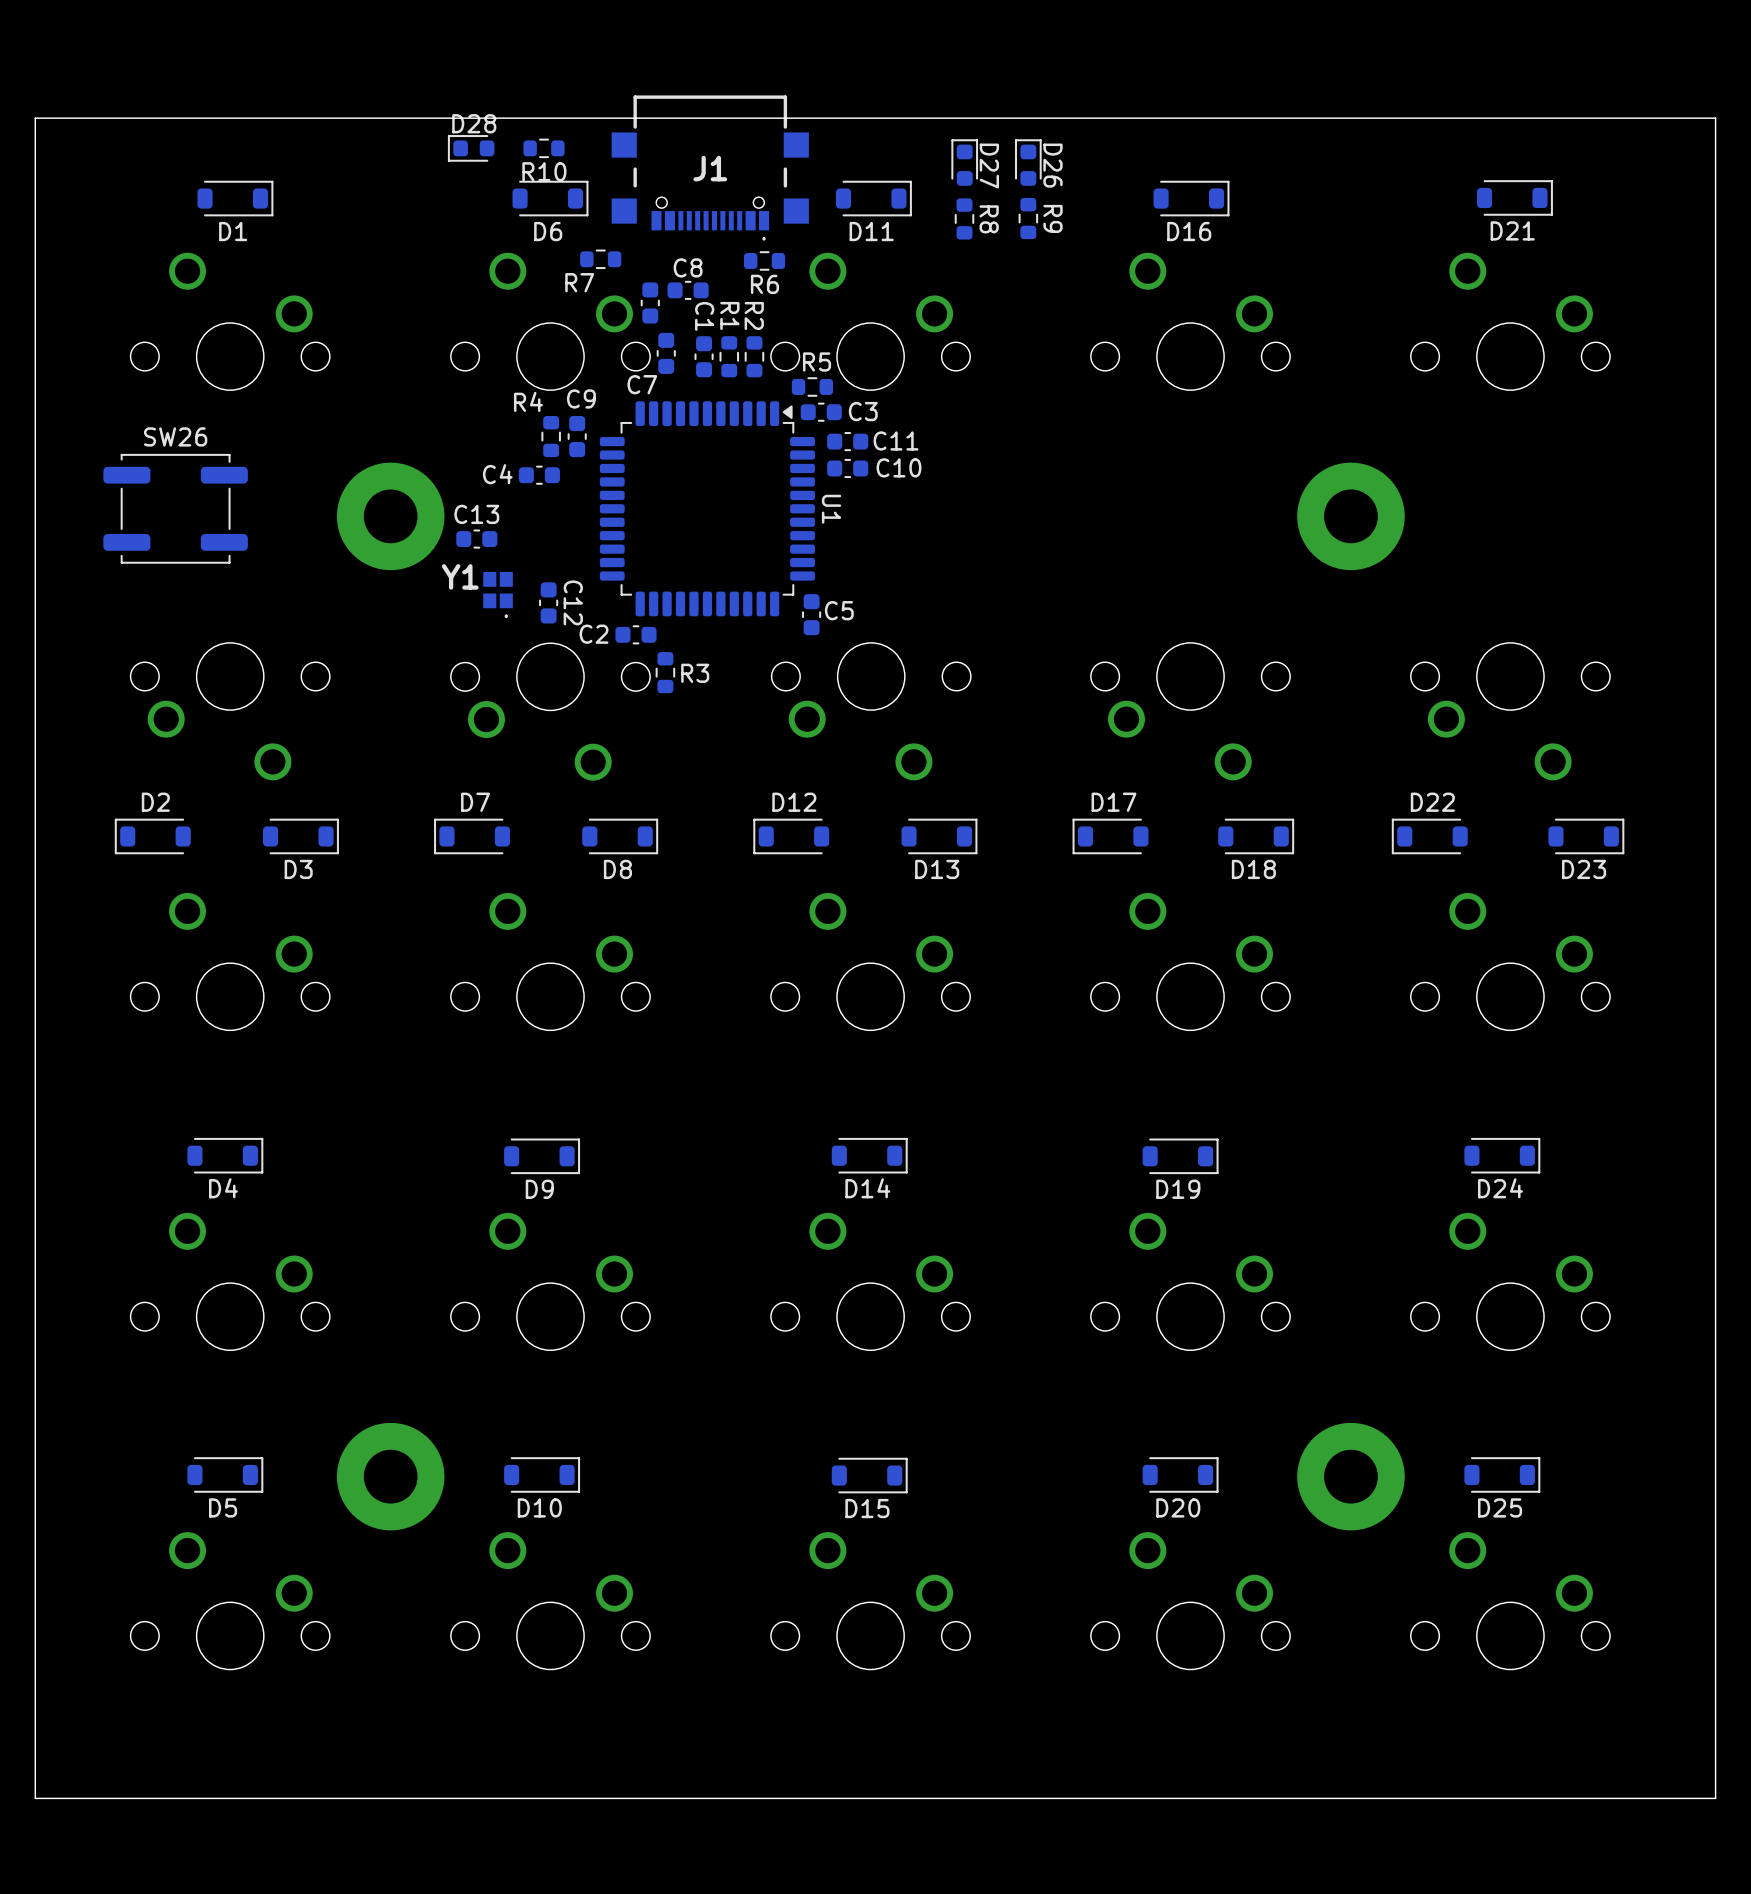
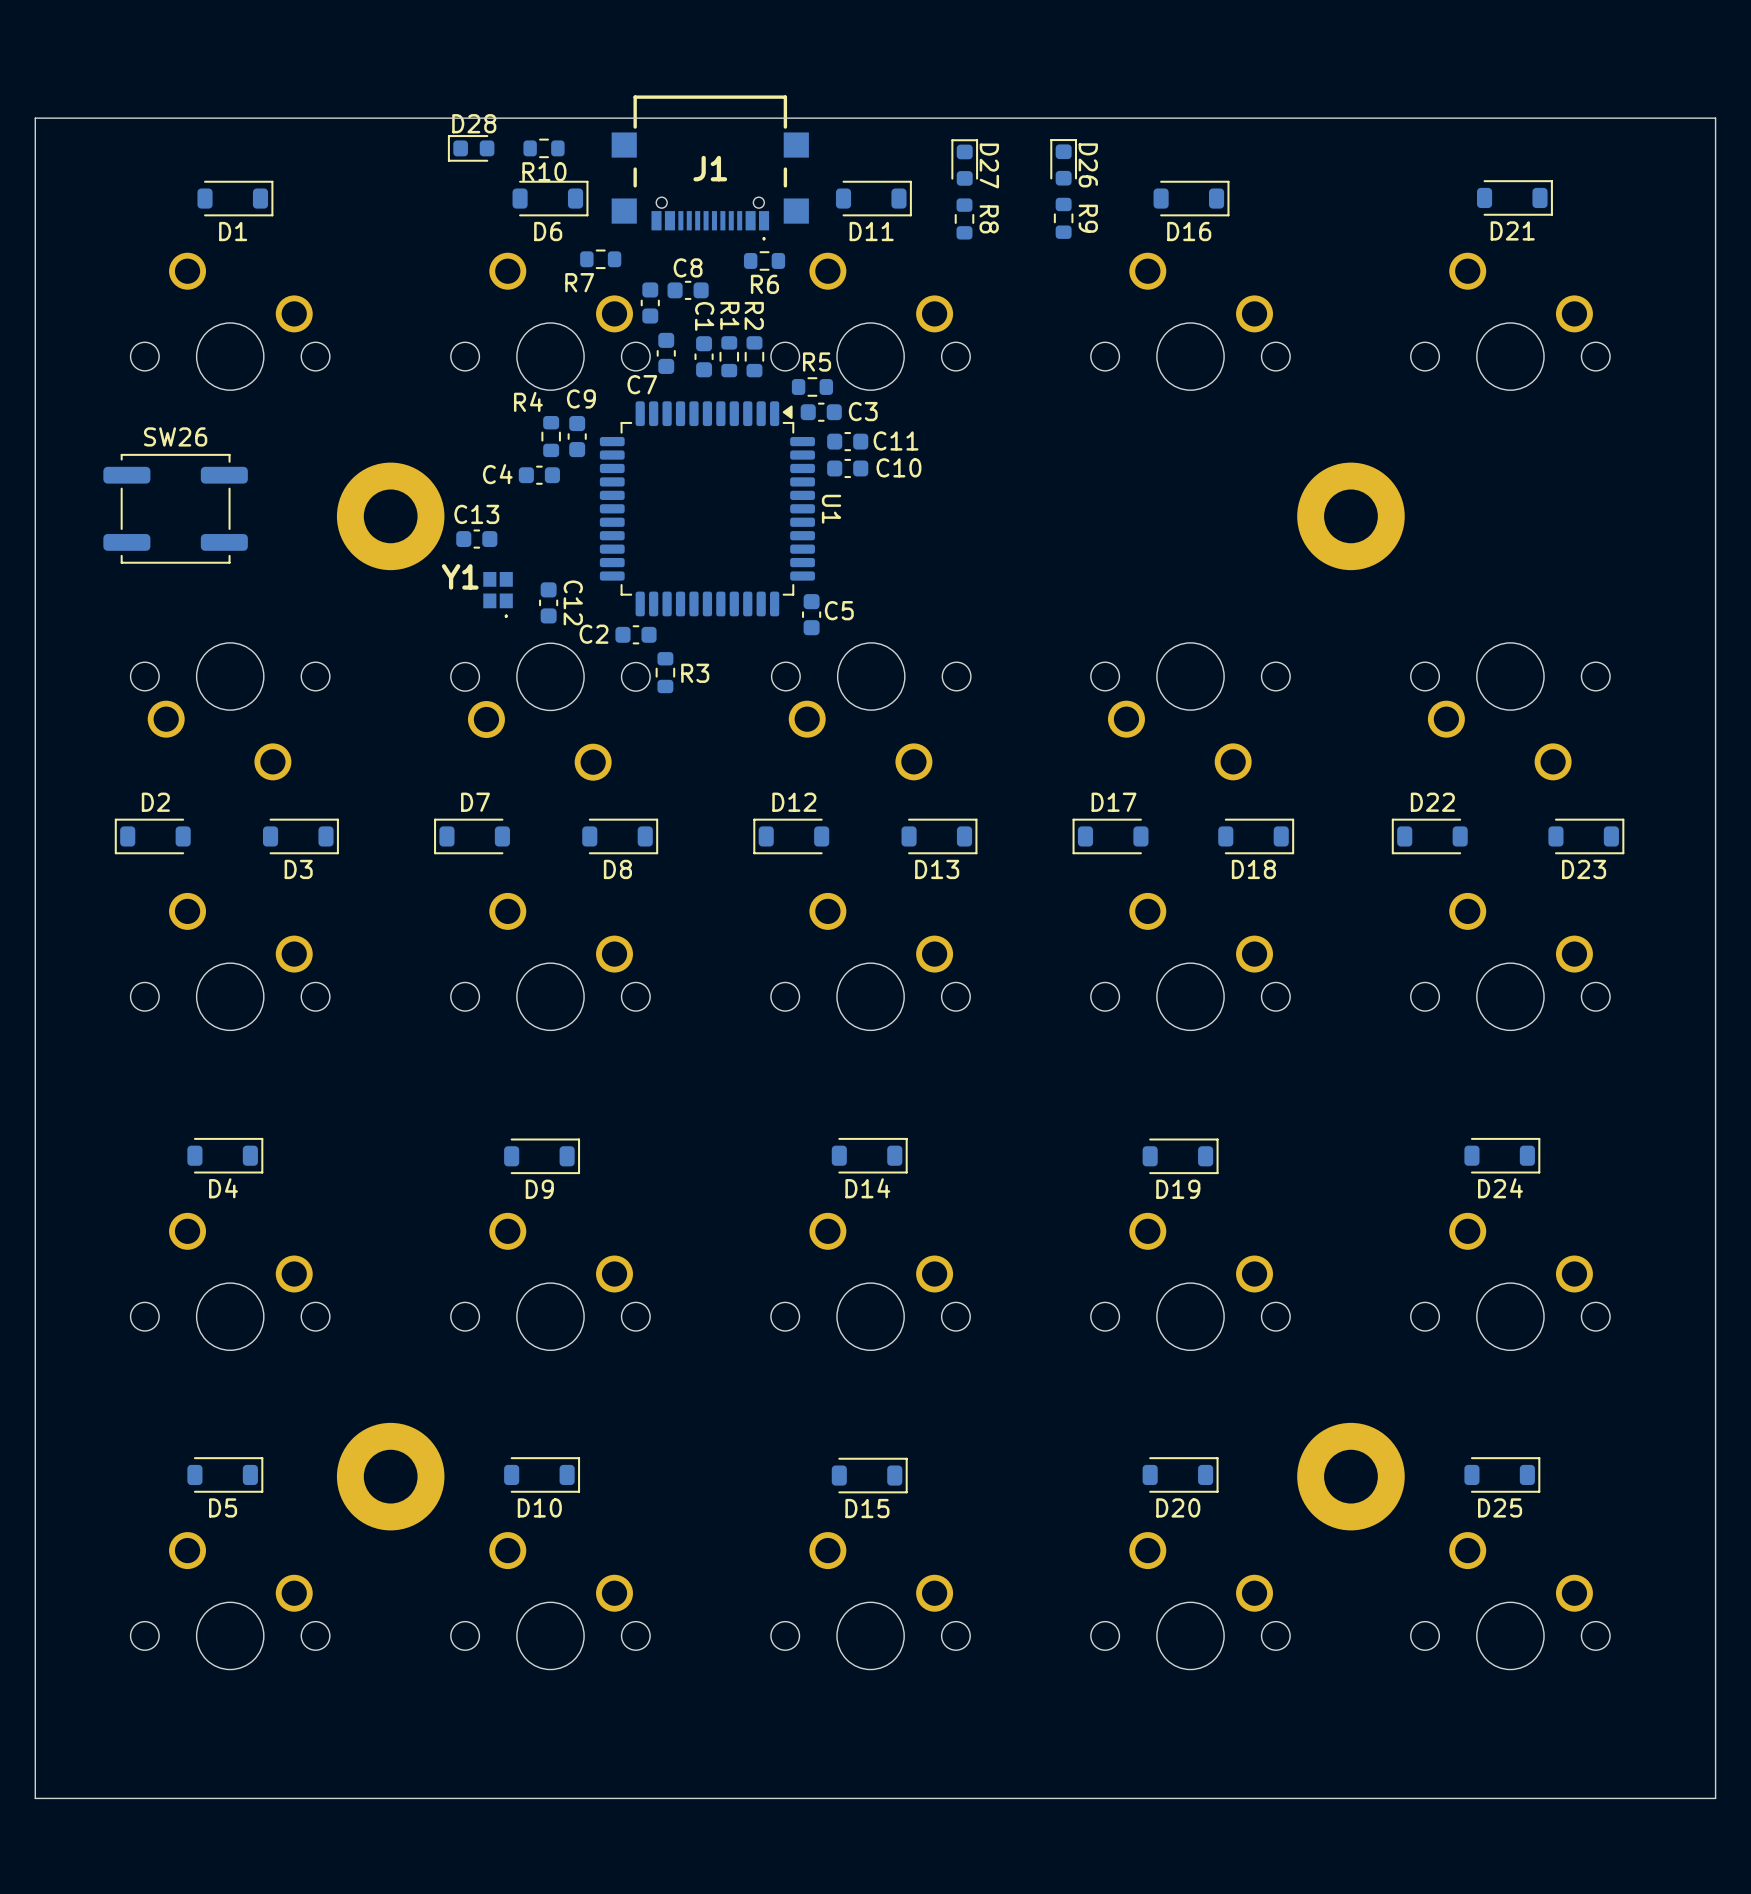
D26 position: (1028, 162) -> (1063, 162)
R9 position: (1028, 218) -> (1063, 218)

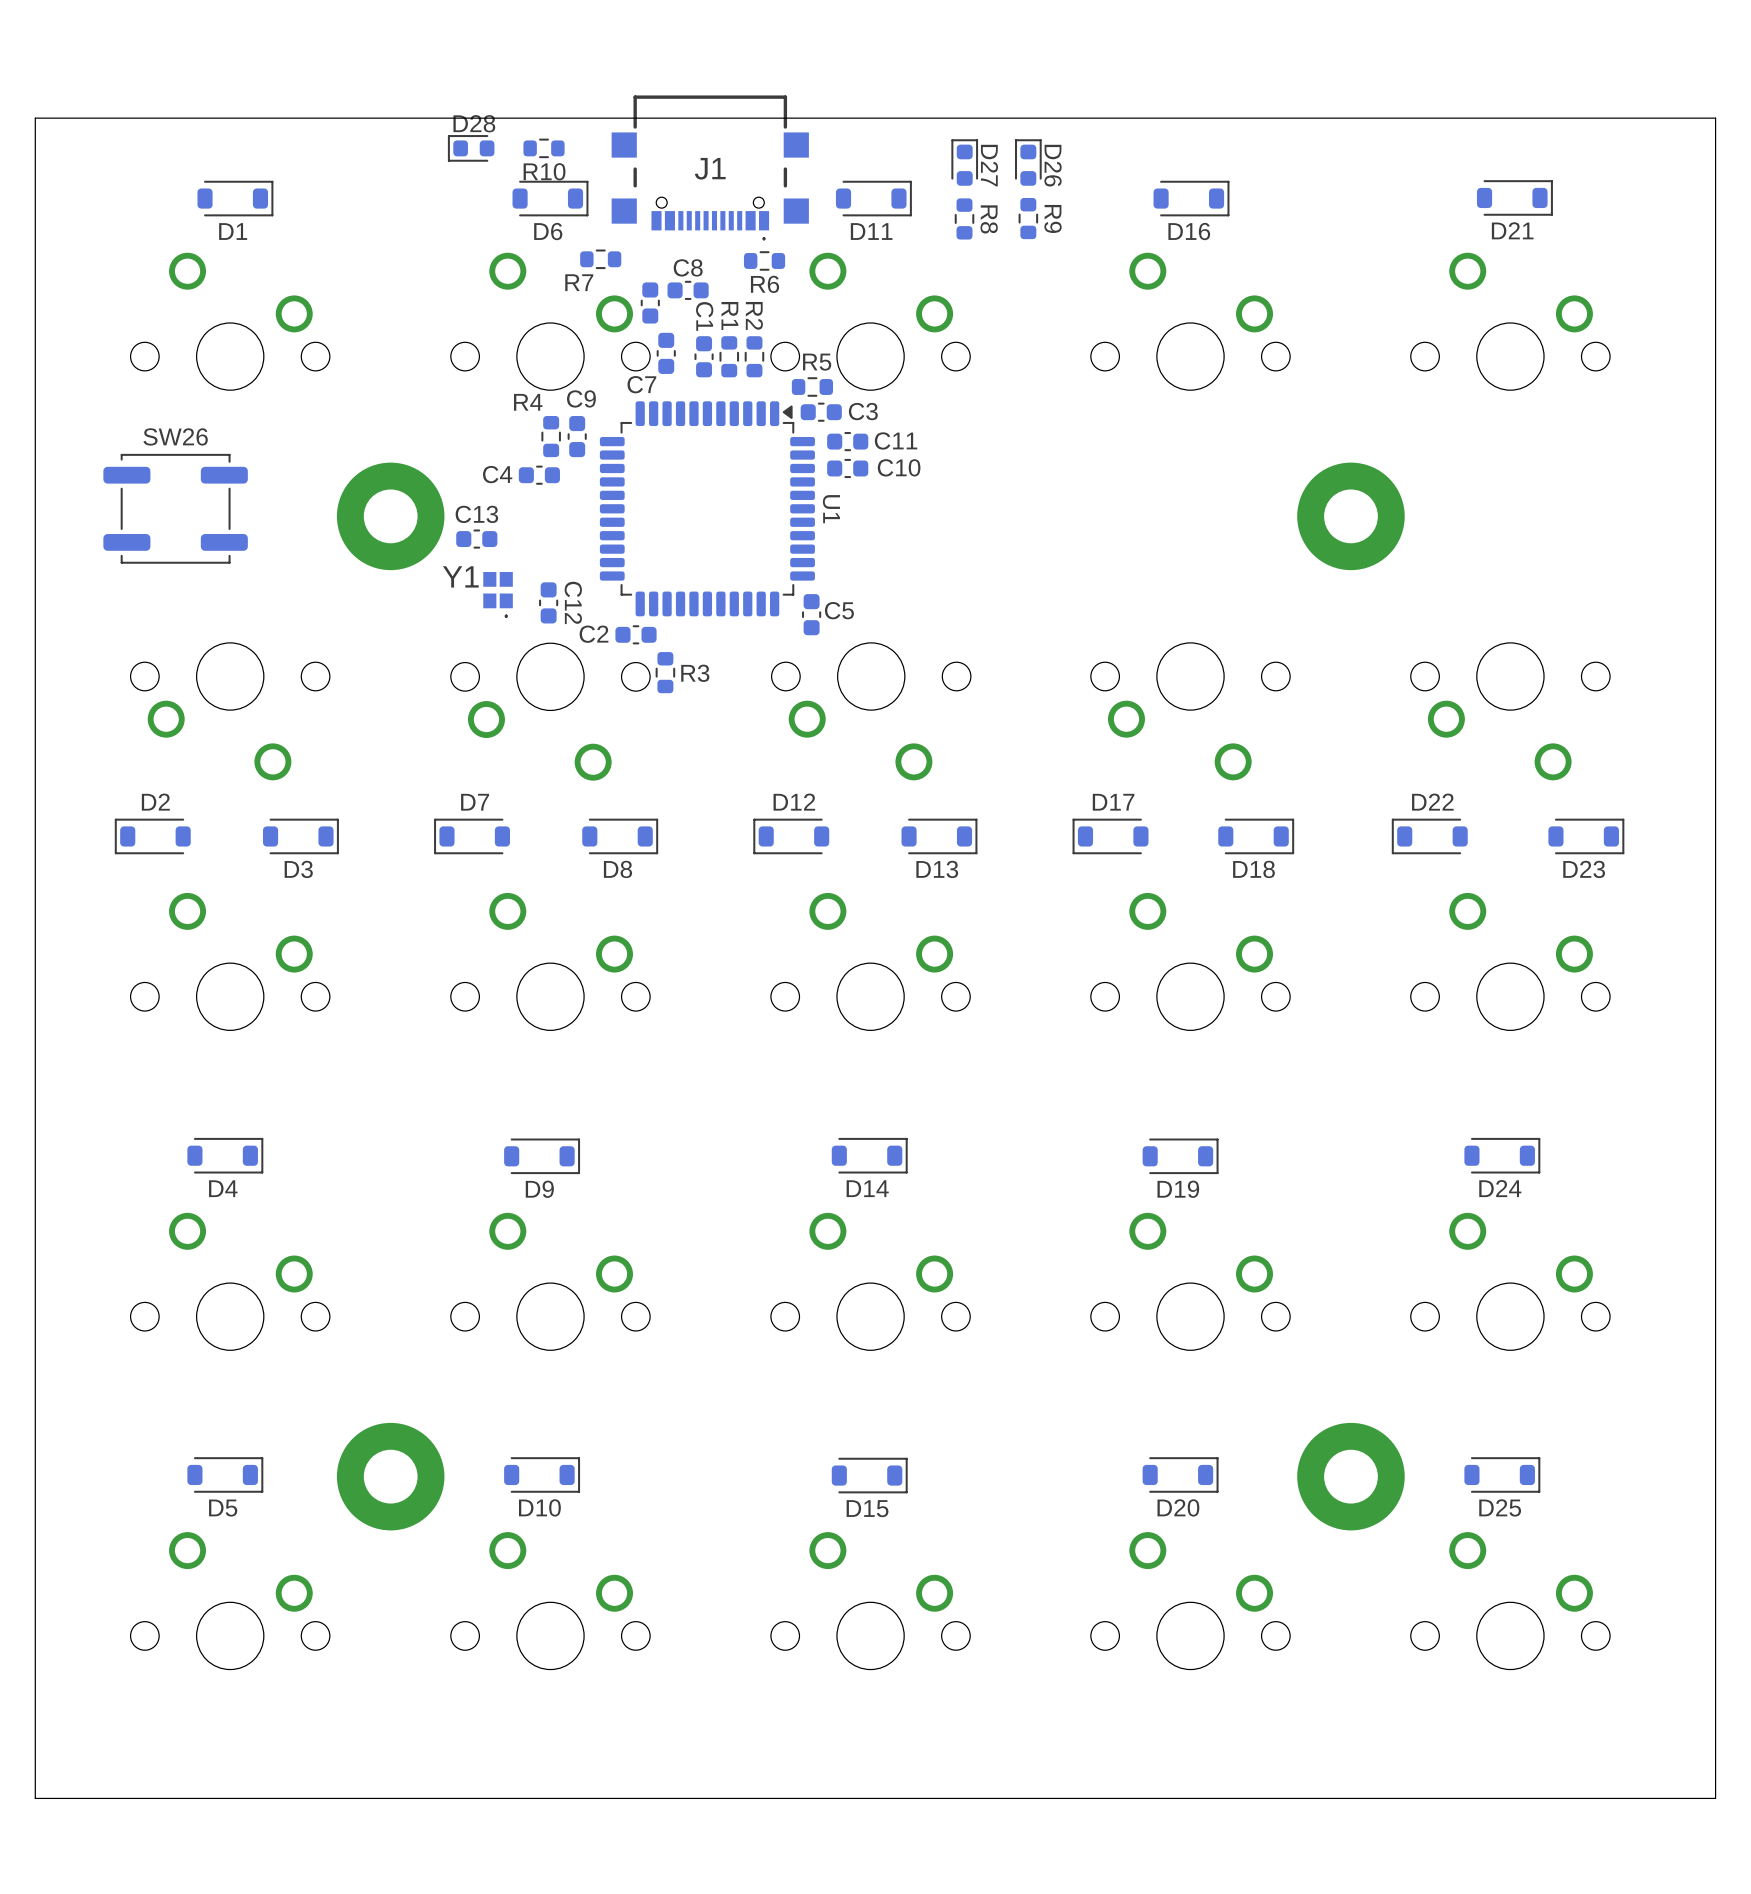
D26 position: (1063, 162) -> (1028, 162)
R9 position: (1063, 218) -> (1028, 218)

